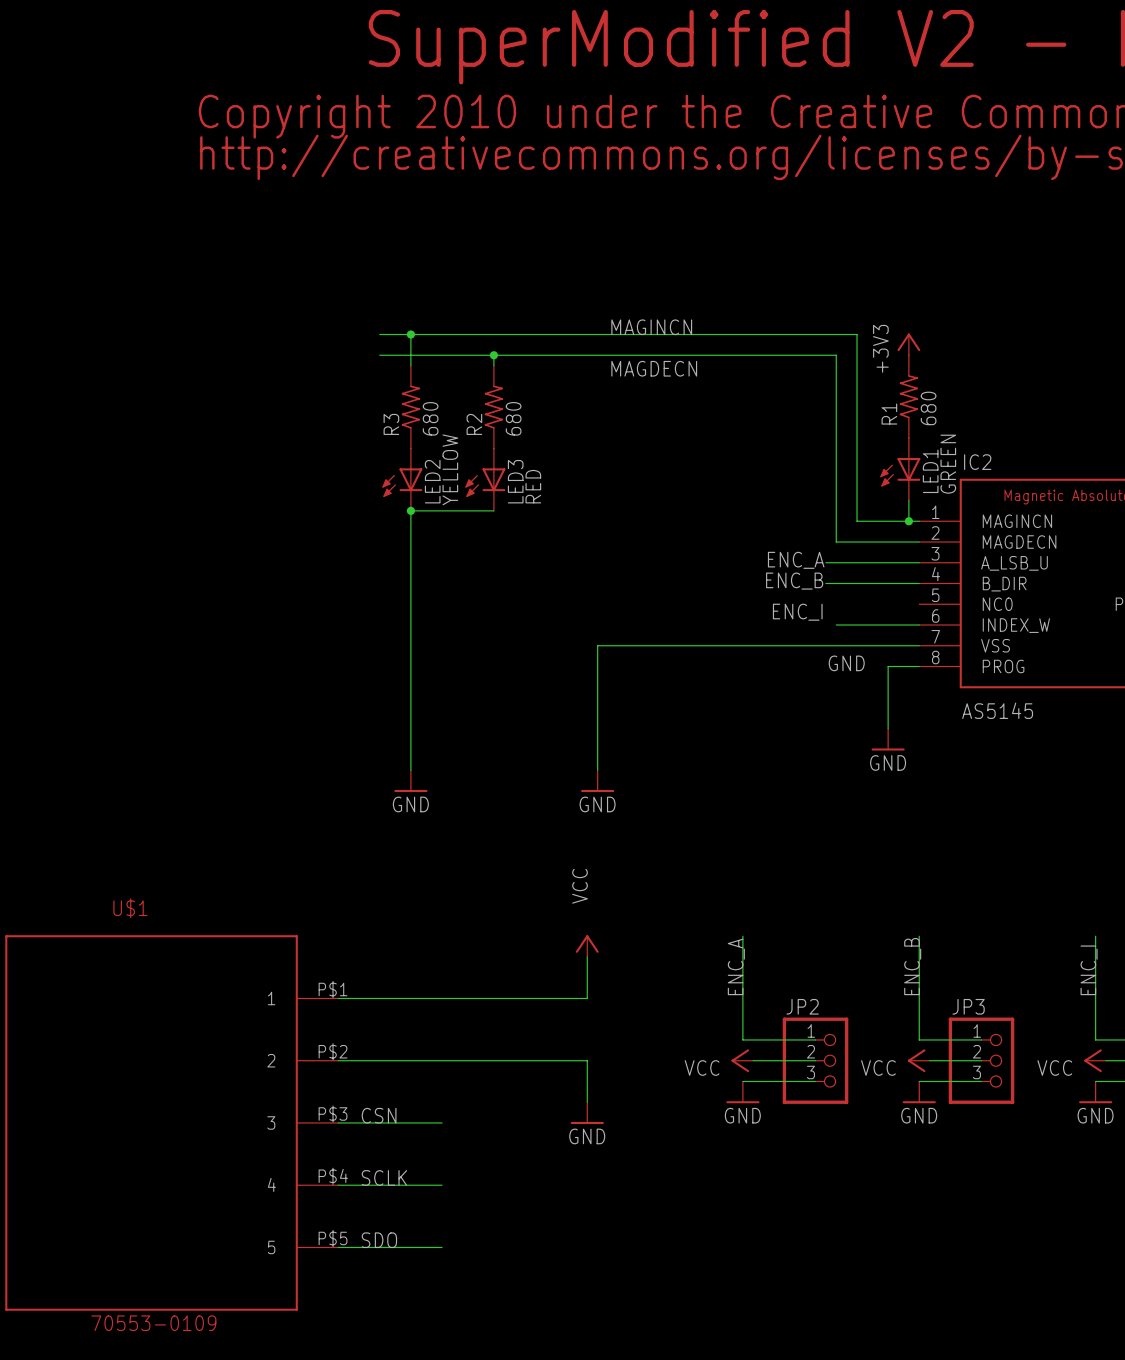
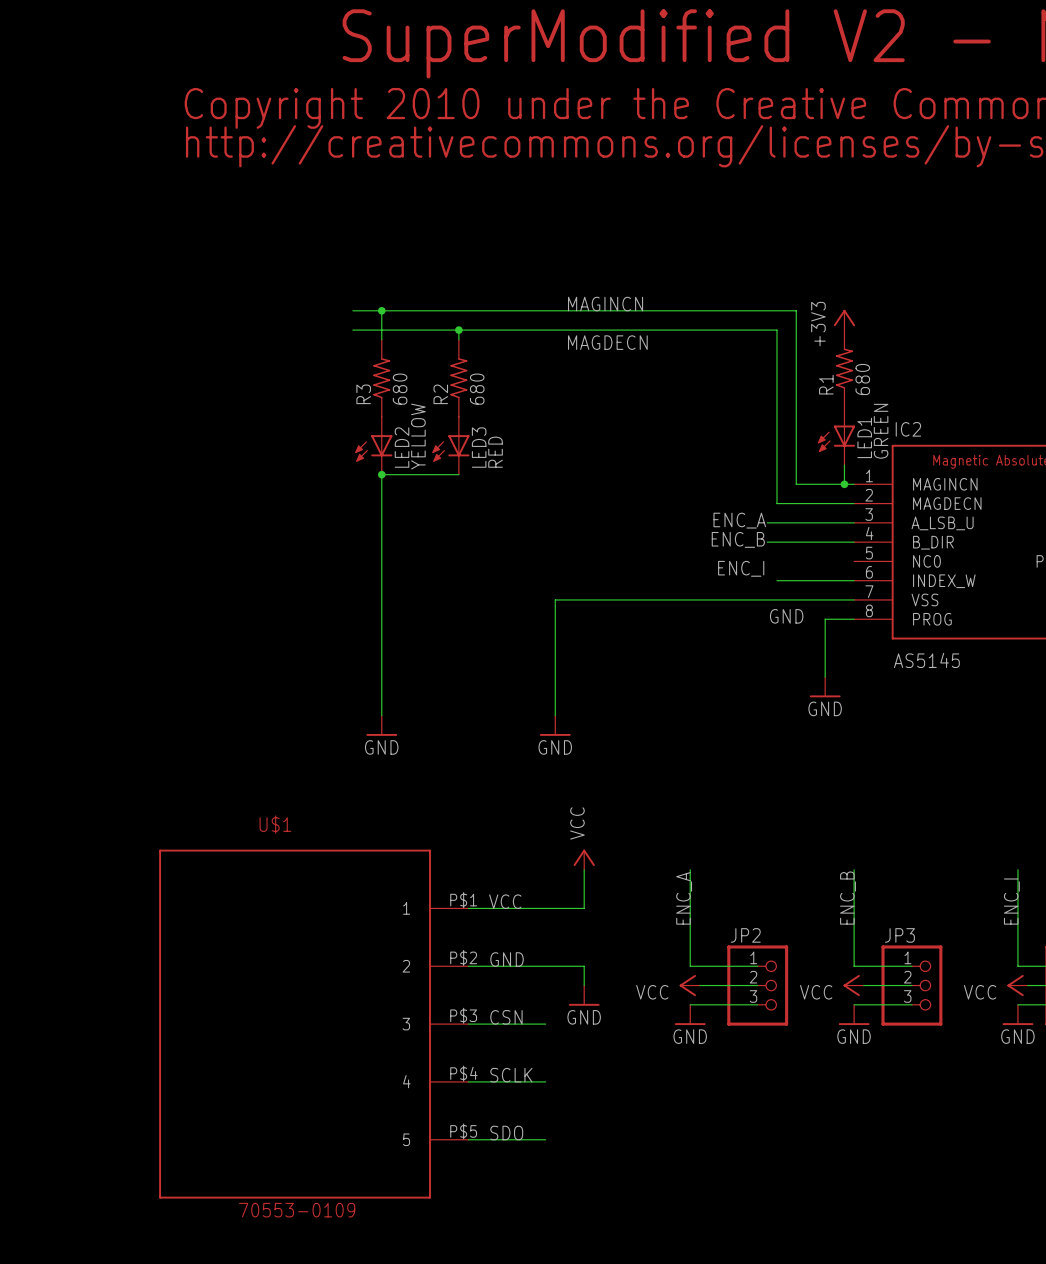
power symbol text position: VCC (580, 886) -> VCC (577, 823)
wire: none -> (584, 869) (584, 908) (468, 908)
power symbol position: VCC (587, 946) -> VCC (584, 859)
wire: (587, 956) (587, 998) (338, 998) -> none
label: none -> VCC (505, 901)
label: none -> GND (507, 959)
wire: none -> (468, 966) (584, 966) (584, 985)
wire: (338, 1060) (587, 1060) (587, 1102) -> (468, 1024) (545, 1024)
power symbol position: GND (587, 1113) -> GND (584, 995)
label position: CSN (379, 1115) -> CSN (506, 1017)
U$1 position: (171, 1122) -> (313, 1024)
wire: (338, 1122) (442, 1122) -> none
wire: none -> (468, 1081) (545, 1081)
label position: SCLK (384, 1177) -> SCLK (511, 1075)
wire: (338, 1185) (442, 1185) -> none
wire: none -> (468, 1139) (545, 1139)
label position: SDO (379, 1240) -> SDO (506, 1133)
wire: (338, 1247) (442, 1247) -> none

